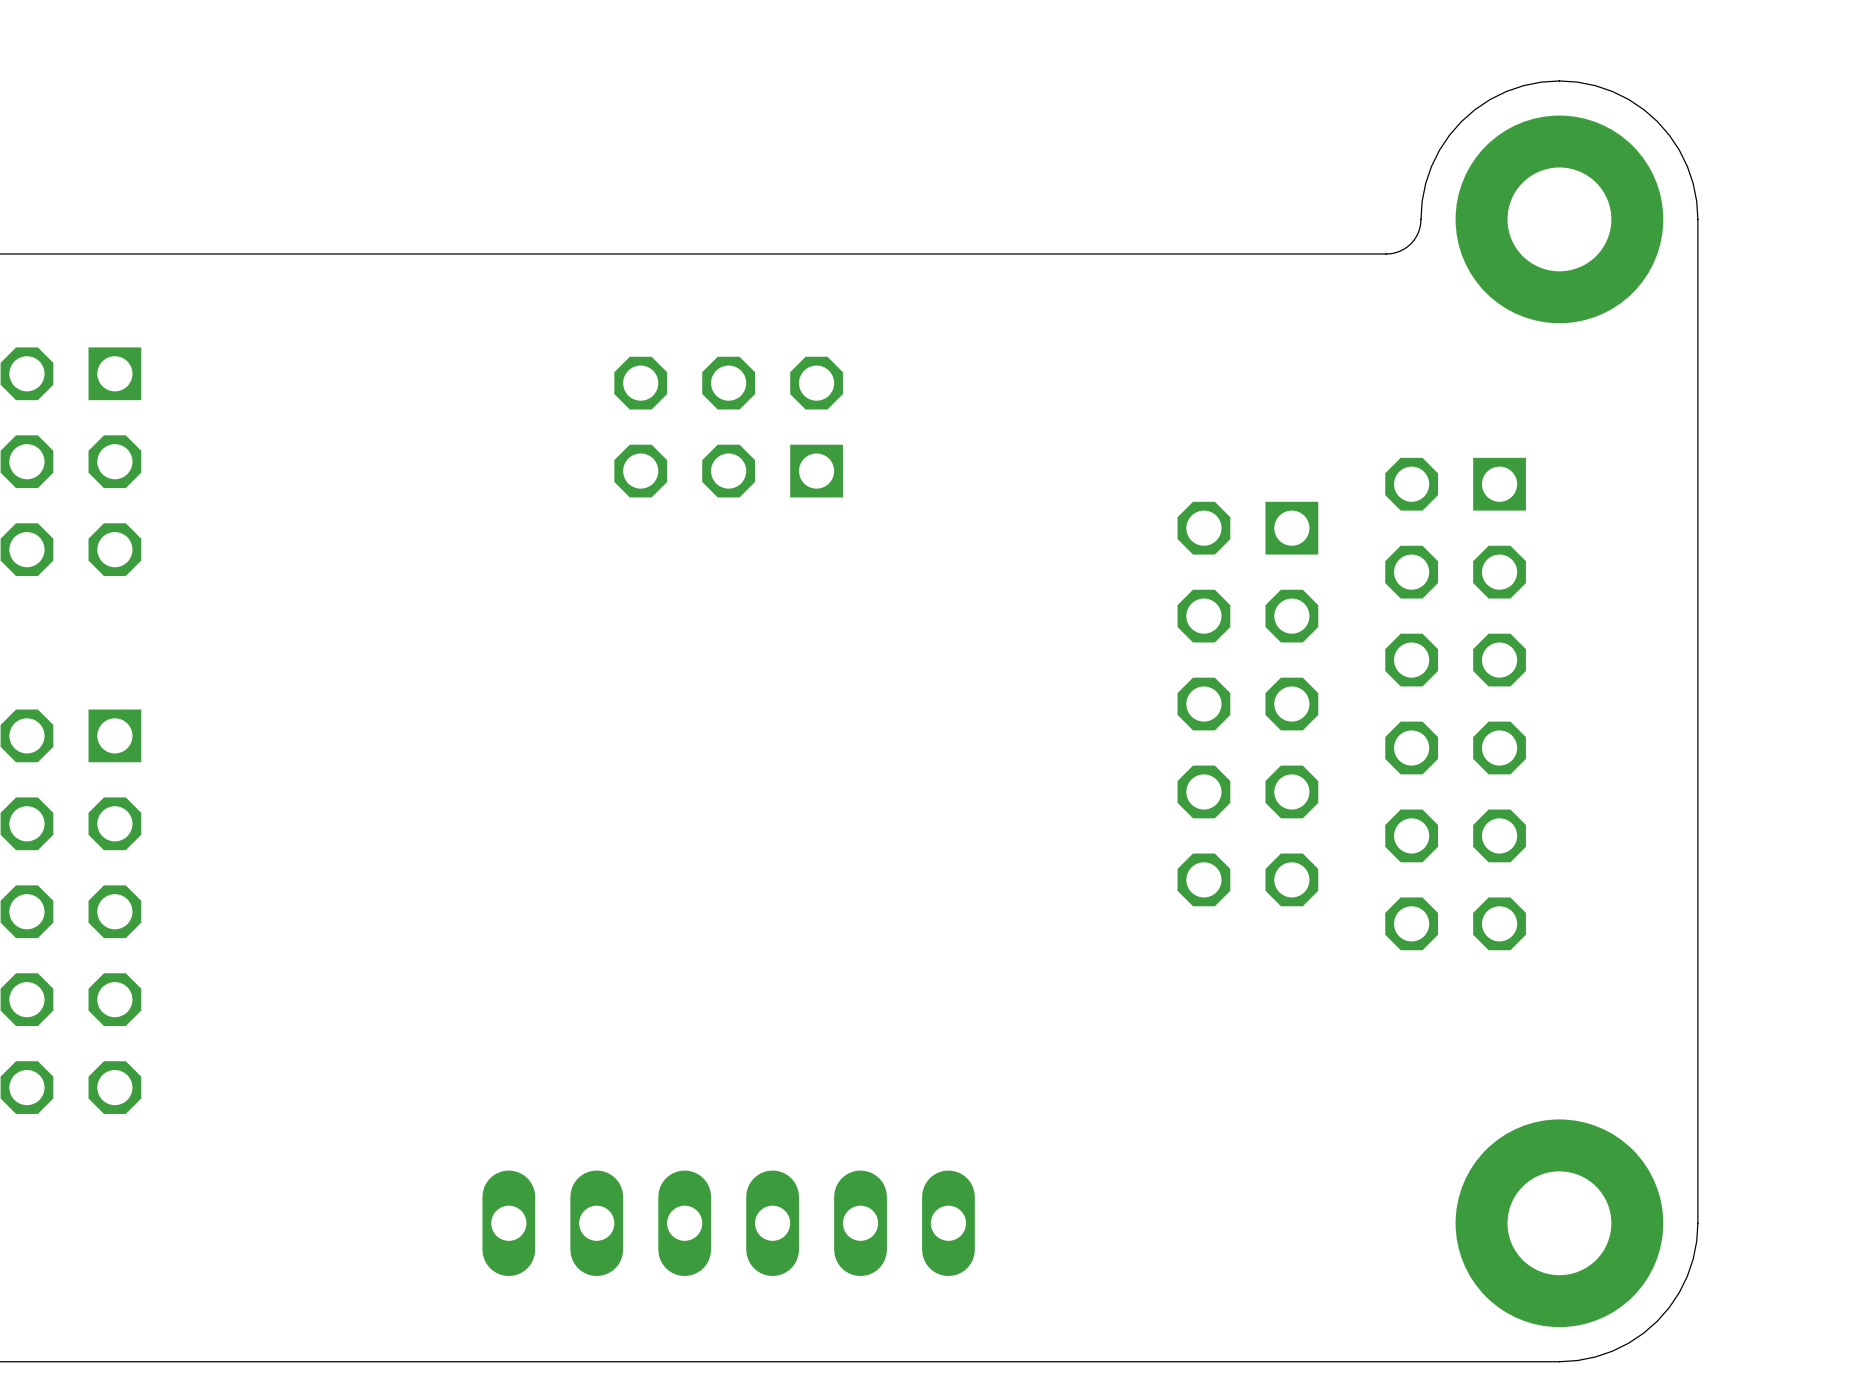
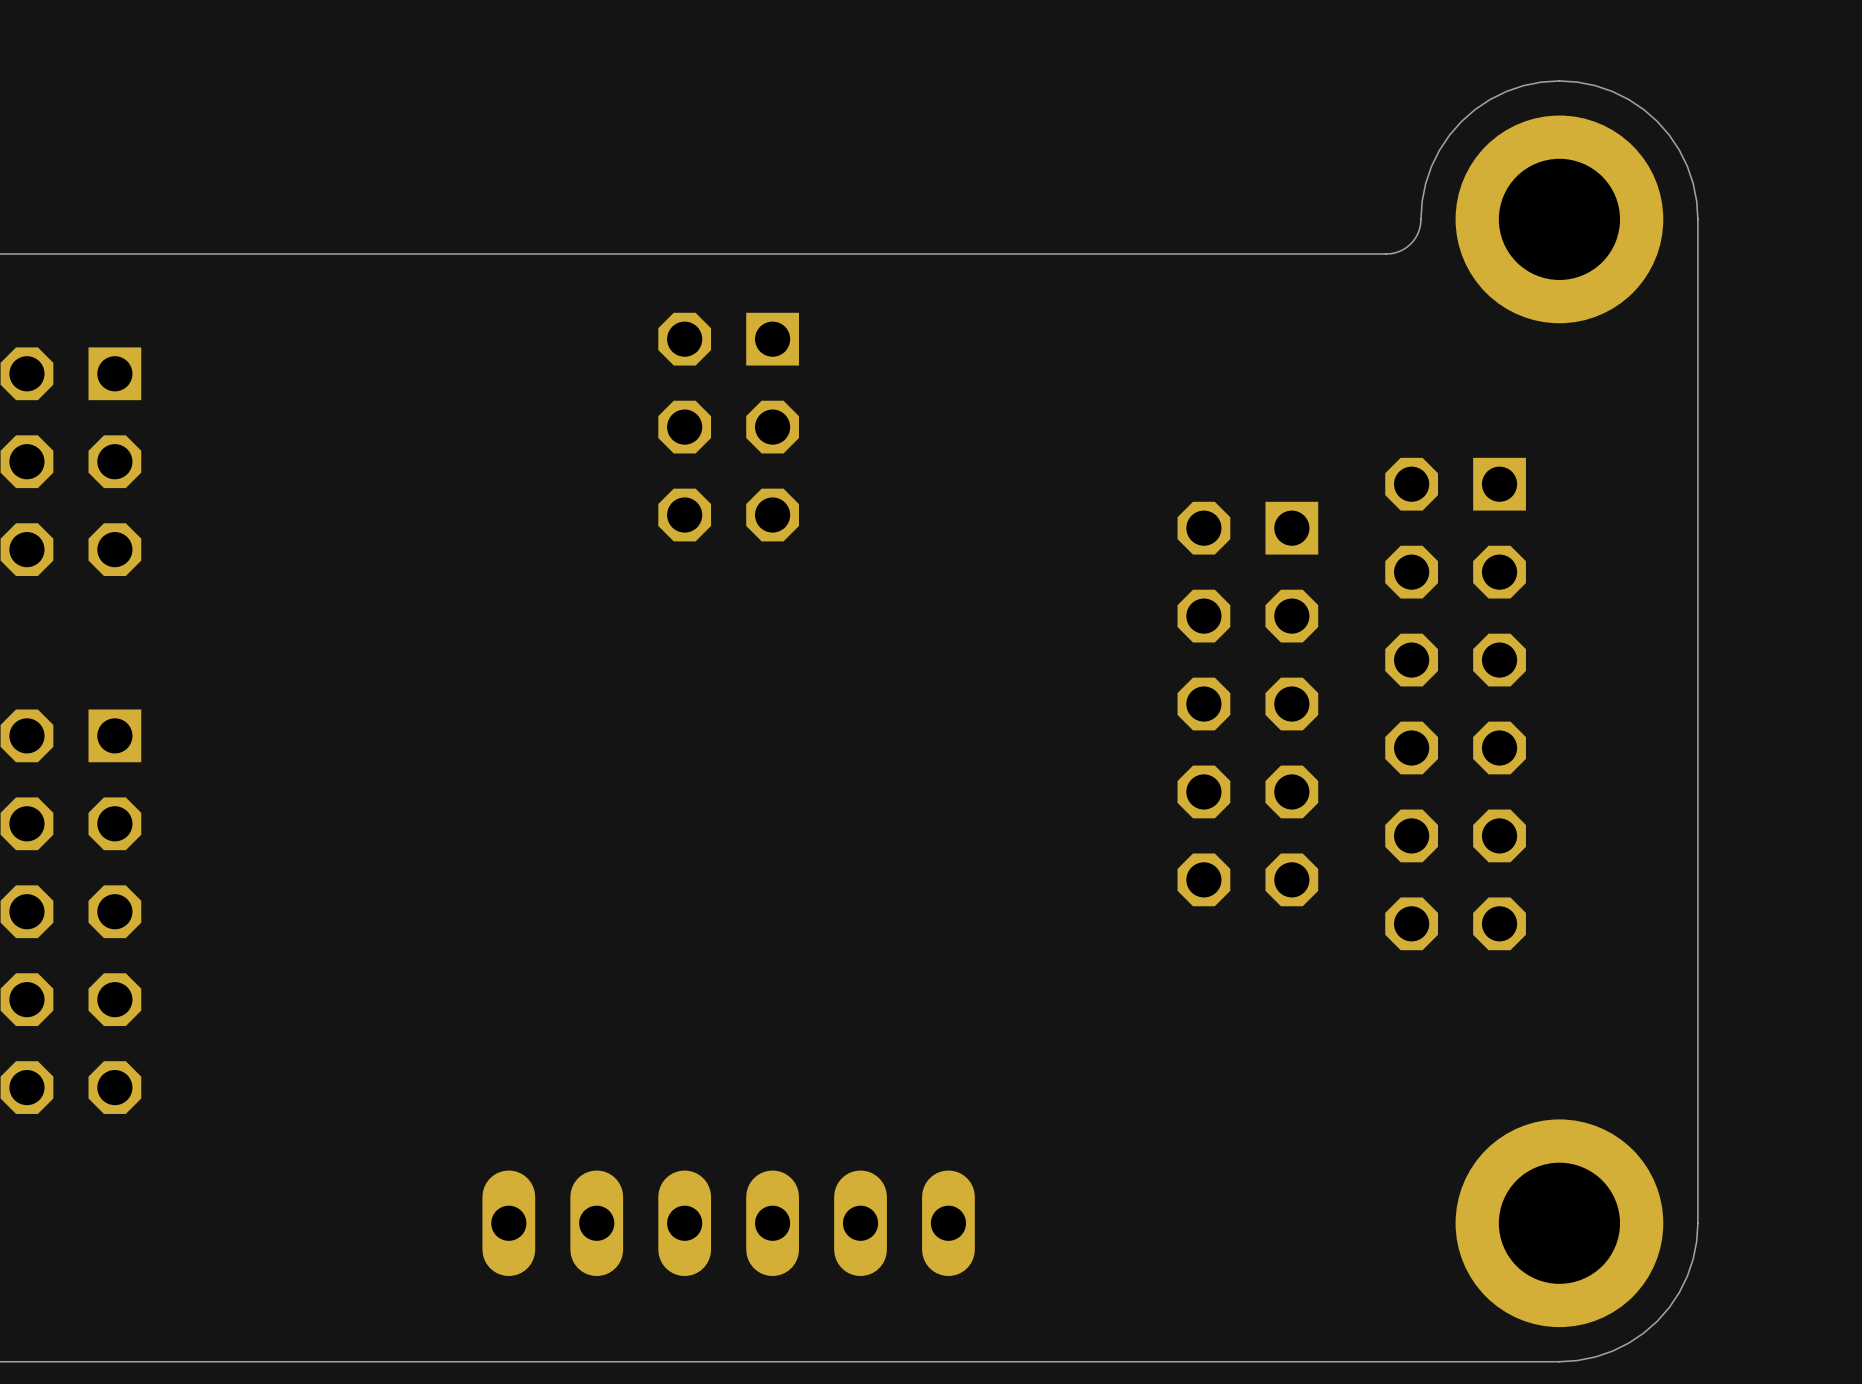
part footprint: [1455, 115, 1664, 324] -> [1455, 115, 1664, 324]
part rotation: 0° (728, 427) -> 90° counterclockwise (728, 427)
part footprint: [1455, 1119, 1664, 1328] -> [1455, 1119, 1664, 1328]

